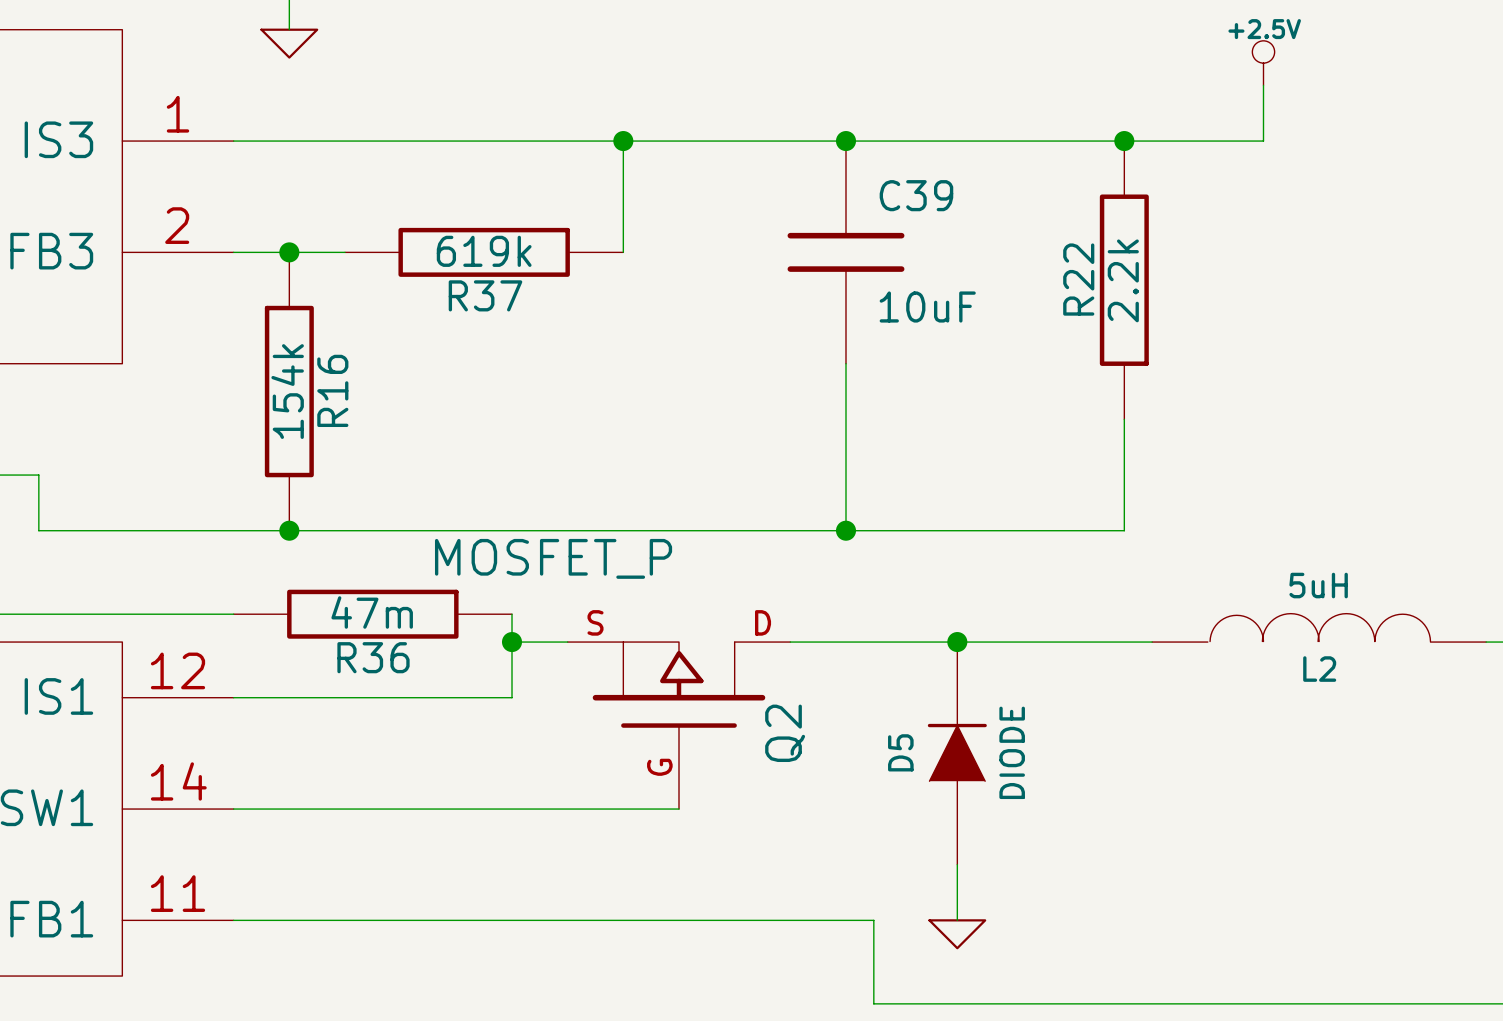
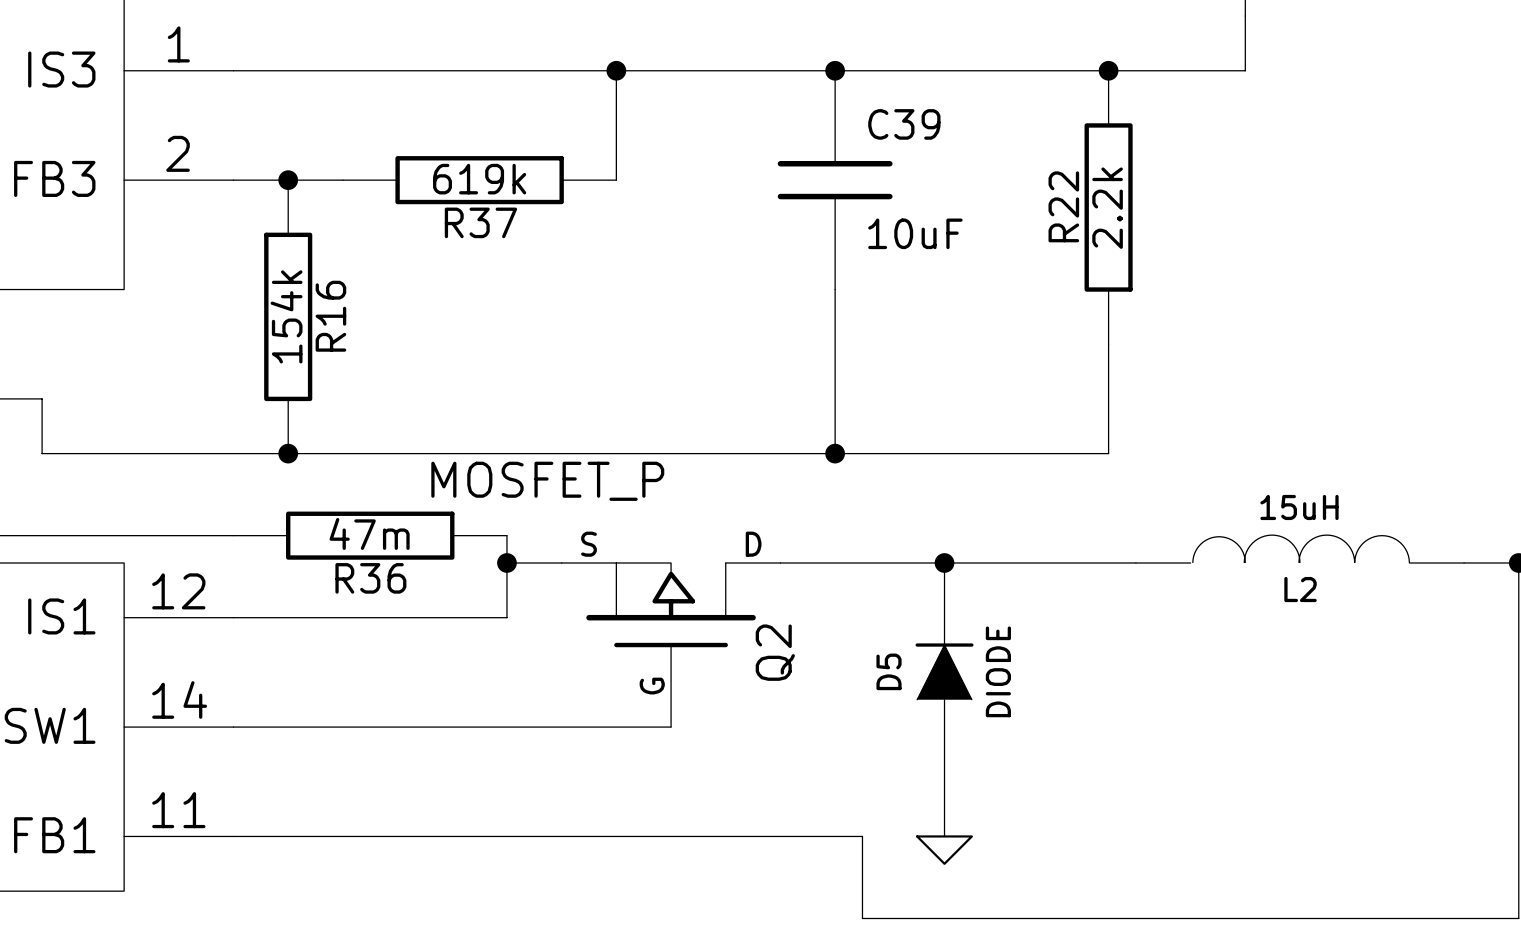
L2 value: 5uH (1318, 585) -> 15uH (1299, 507)

